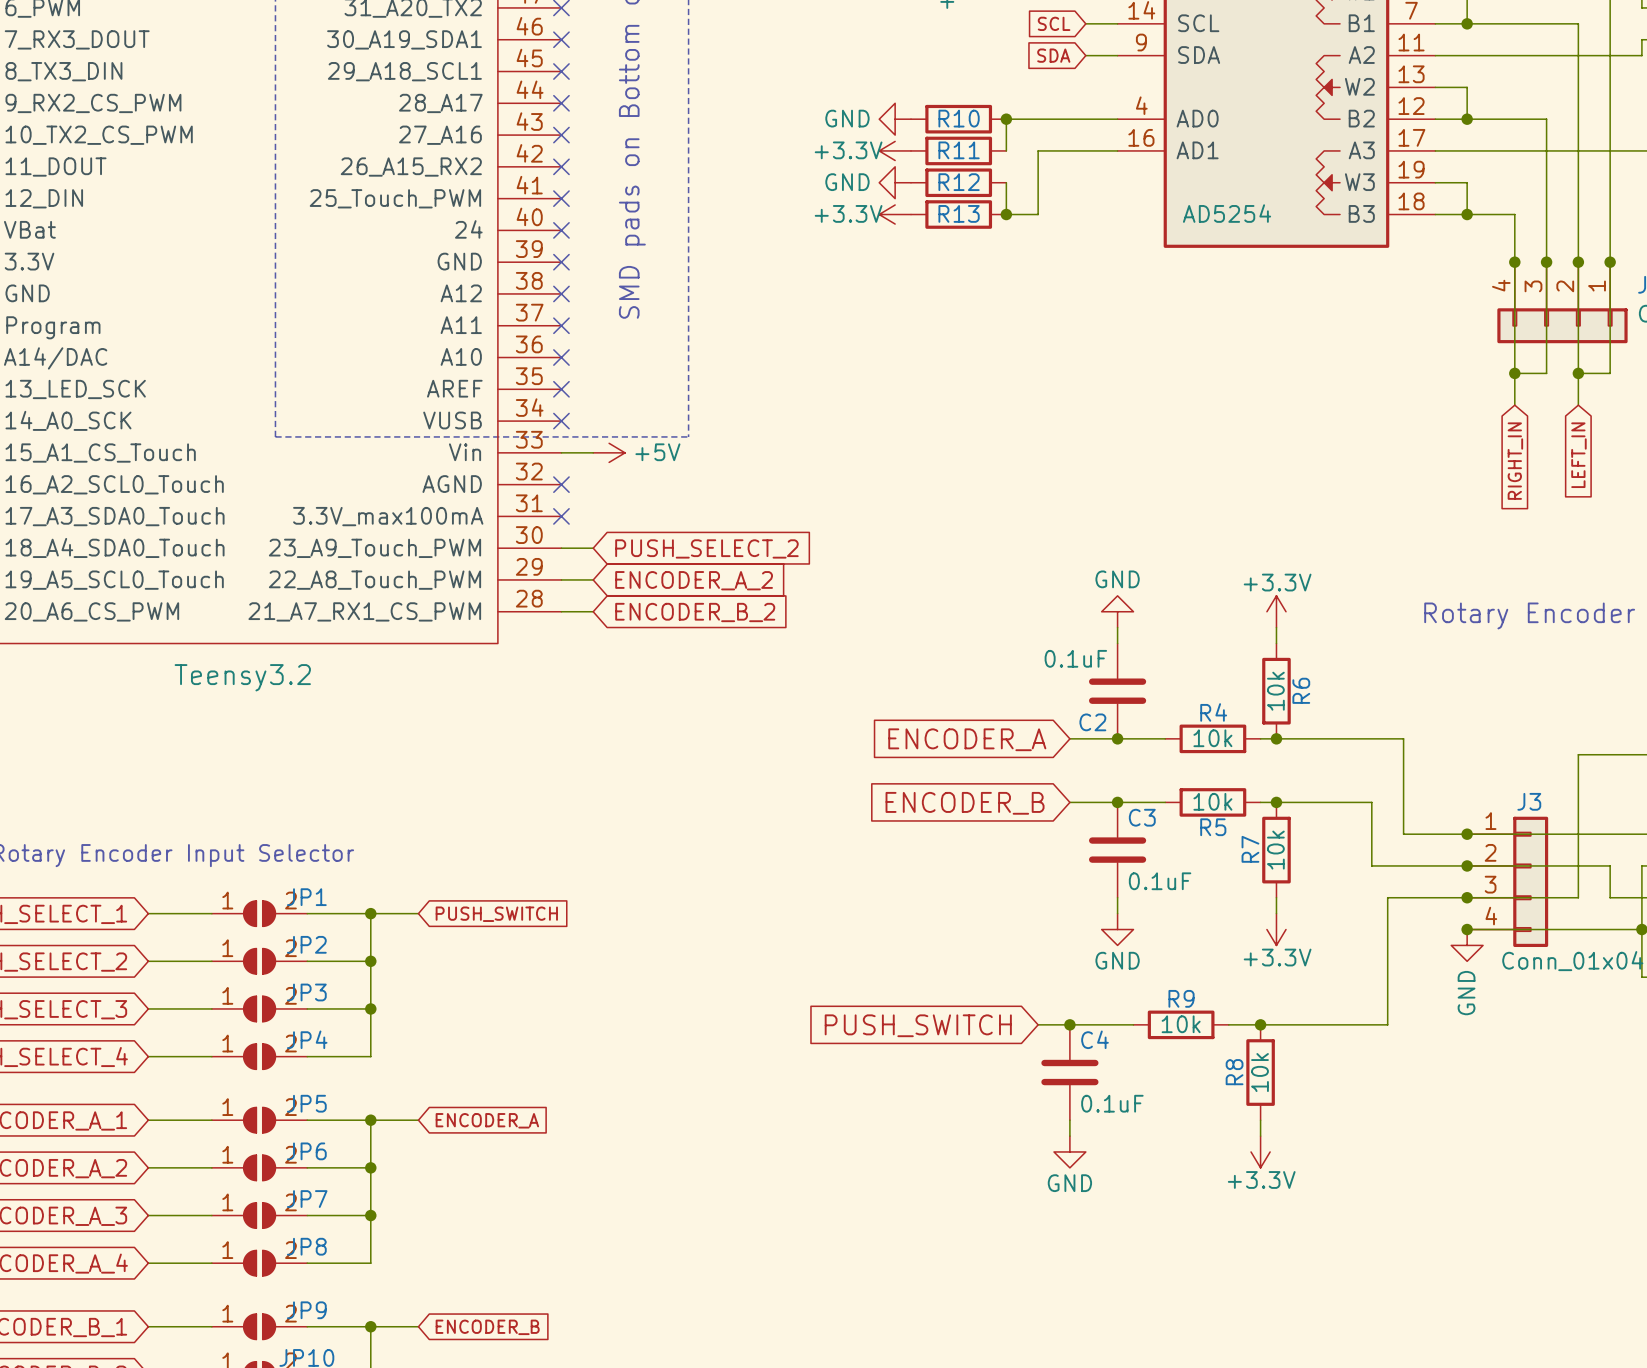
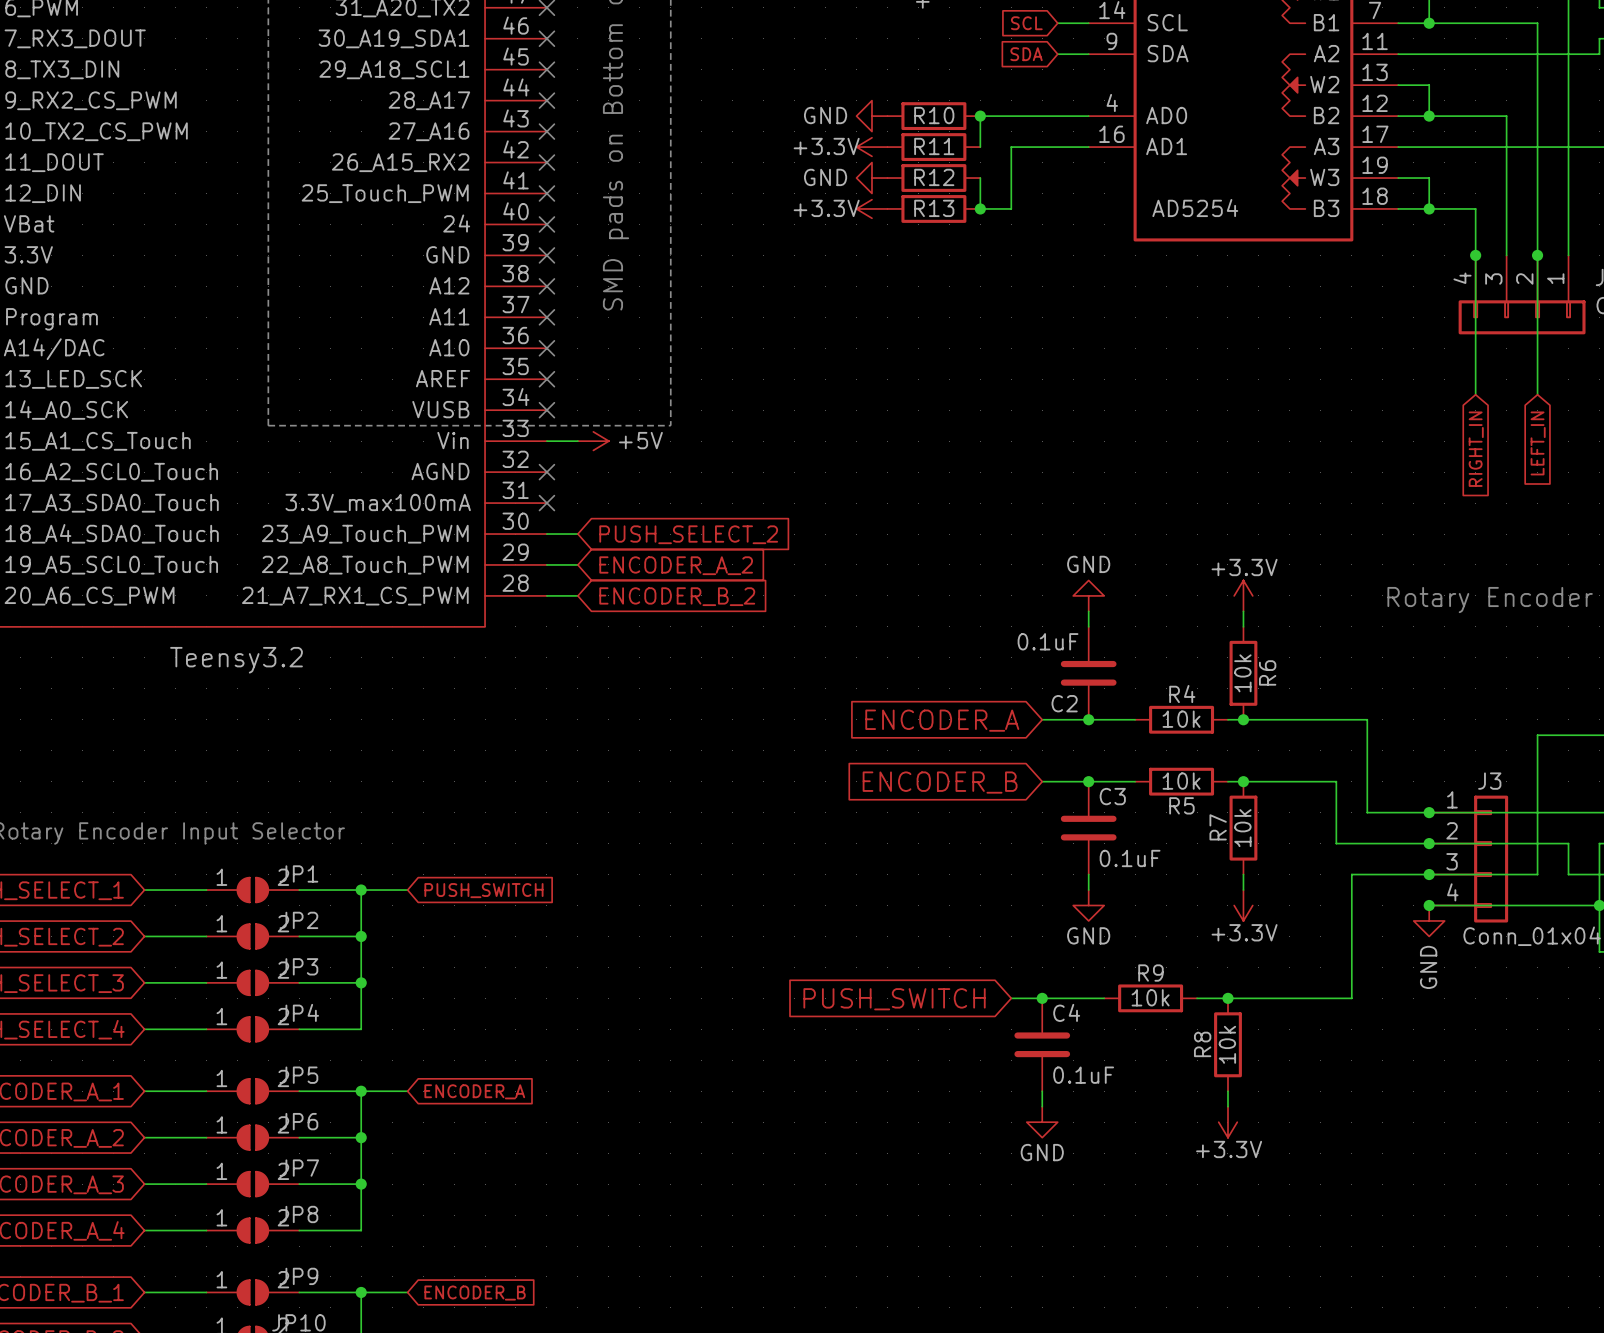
wire: (1546, 262) (1546, 373) (1514, 373) -> none
junction: (1546, 262) -> none
wire: (1610, 262) (1610, 373) (1578, 373) -> none
junction: (1610, 262) -> none
junction: (1514, 373) -> none
junction: (1578, 373) -> none

